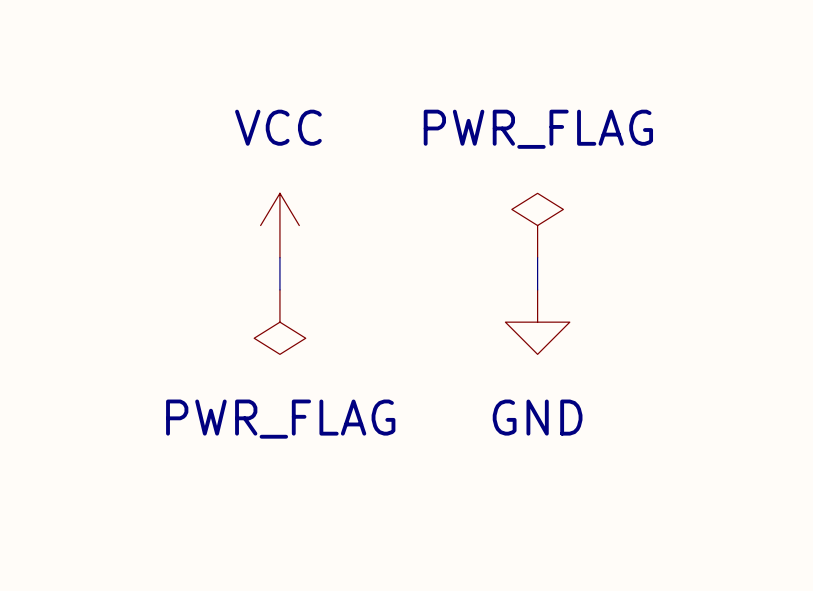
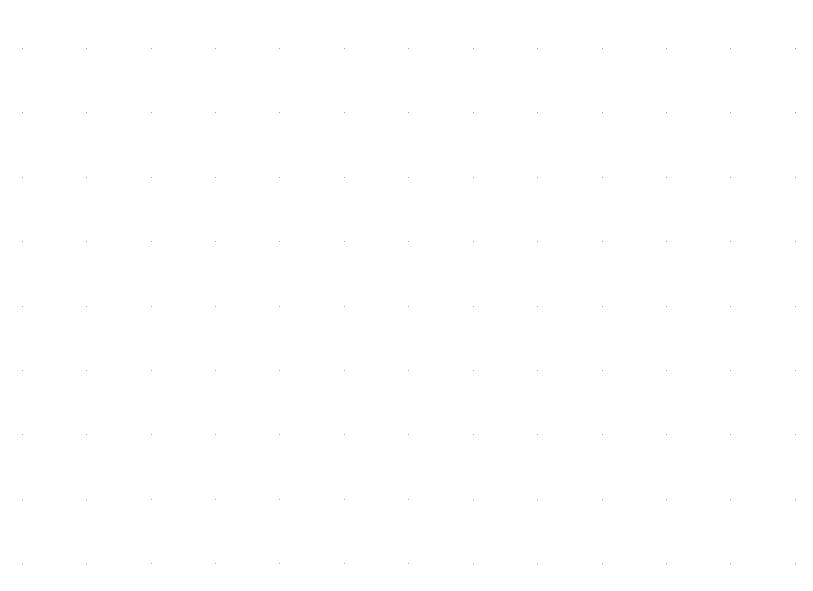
power symbol: VCC (279, 225) -> none
power symbol: PWR_FLAG (537, 225) -> none
wire: (279, 257) (279, 289) -> none
wire: (537, 257) (537, 289) -> none
power symbol: PWR_FLAG (279, 322) -> none
power symbol: GND (537, 322) -> none

